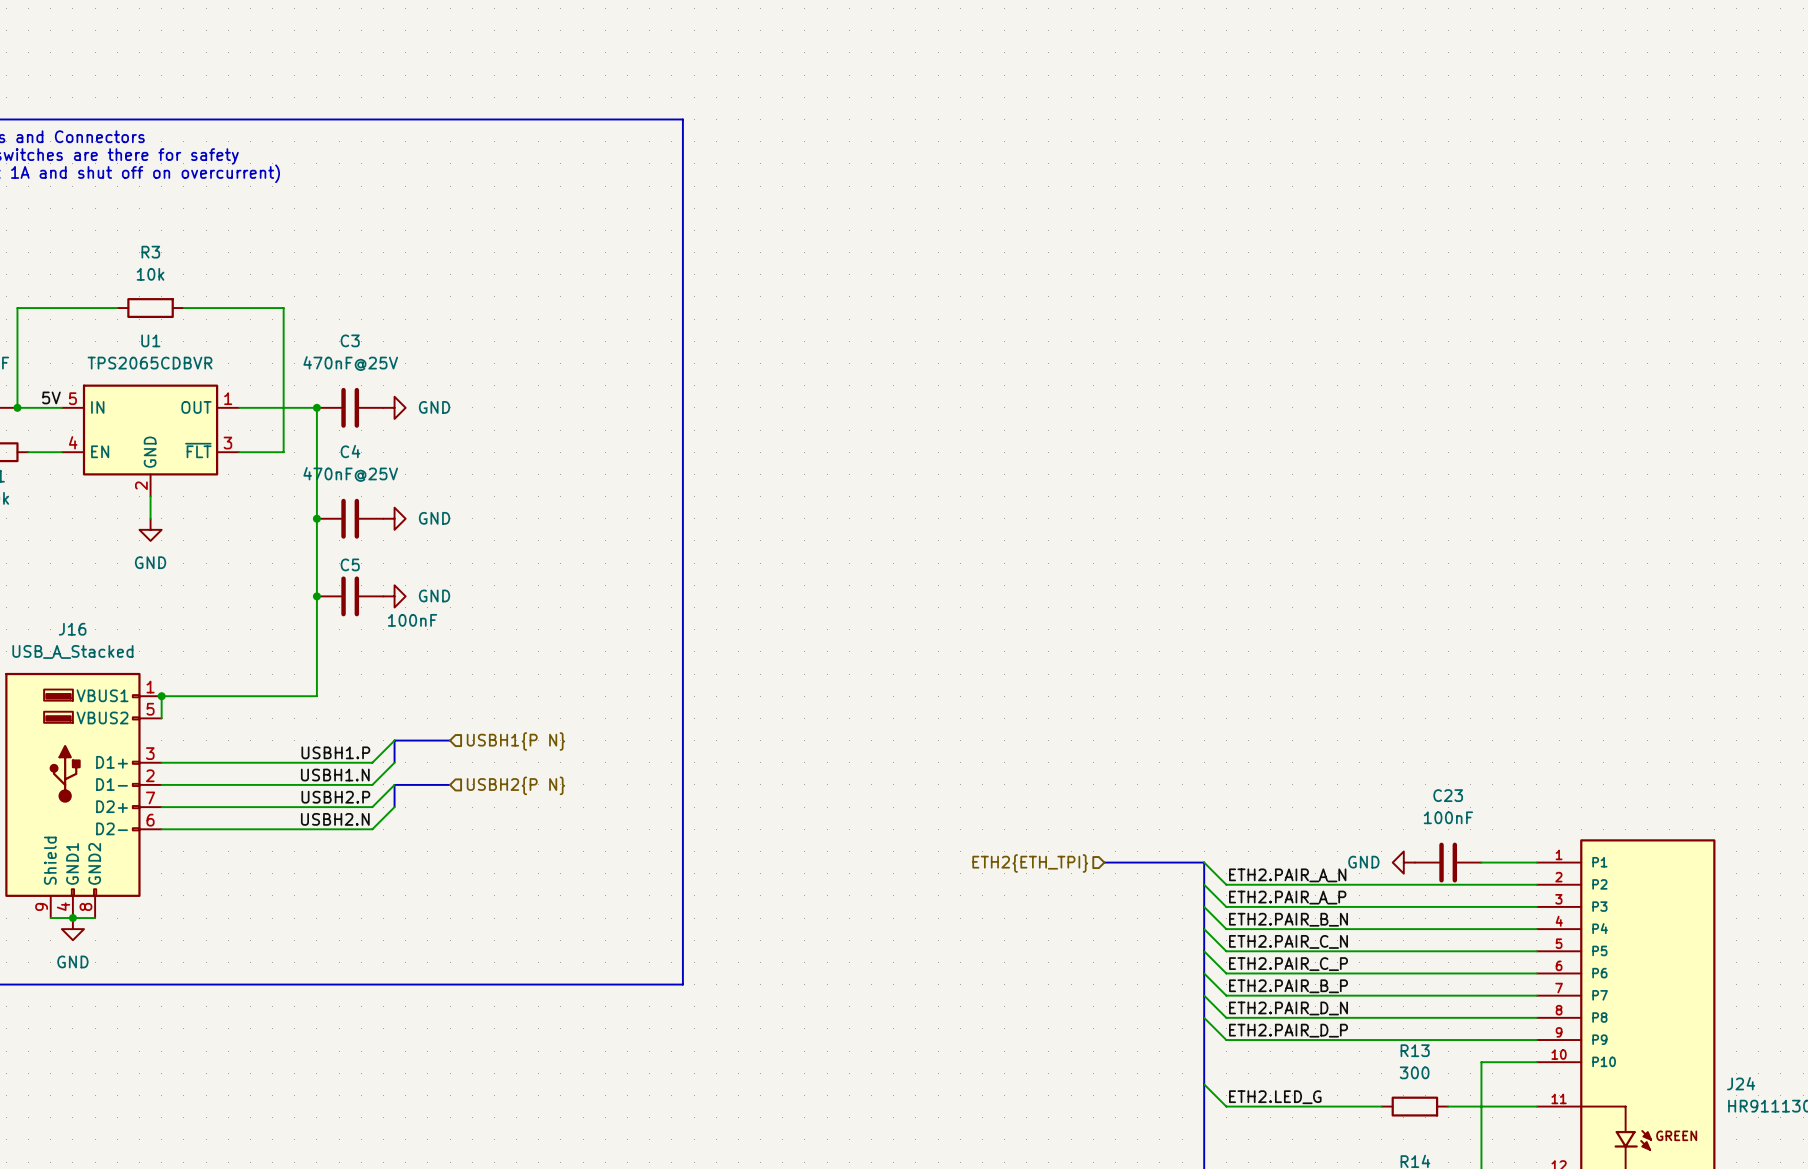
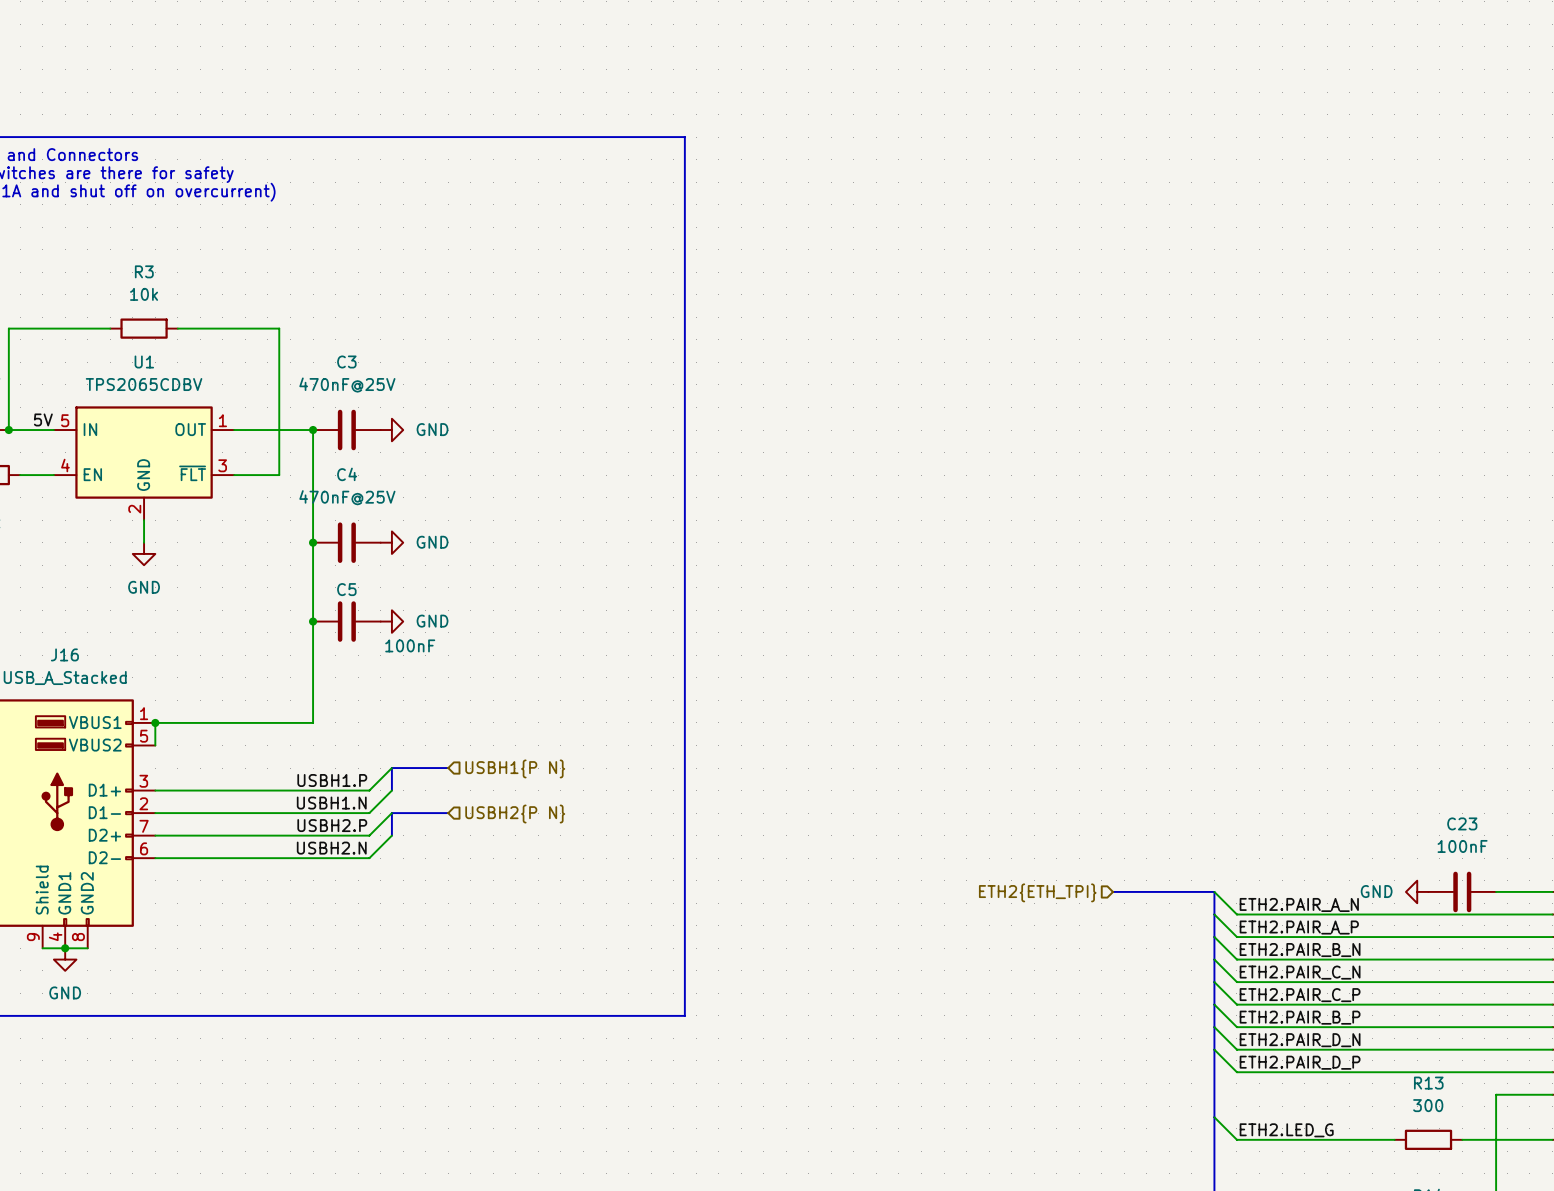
U1 value: TPS2065CDBVR (150, 363) -> TPS2065CDBV (144, 384)

